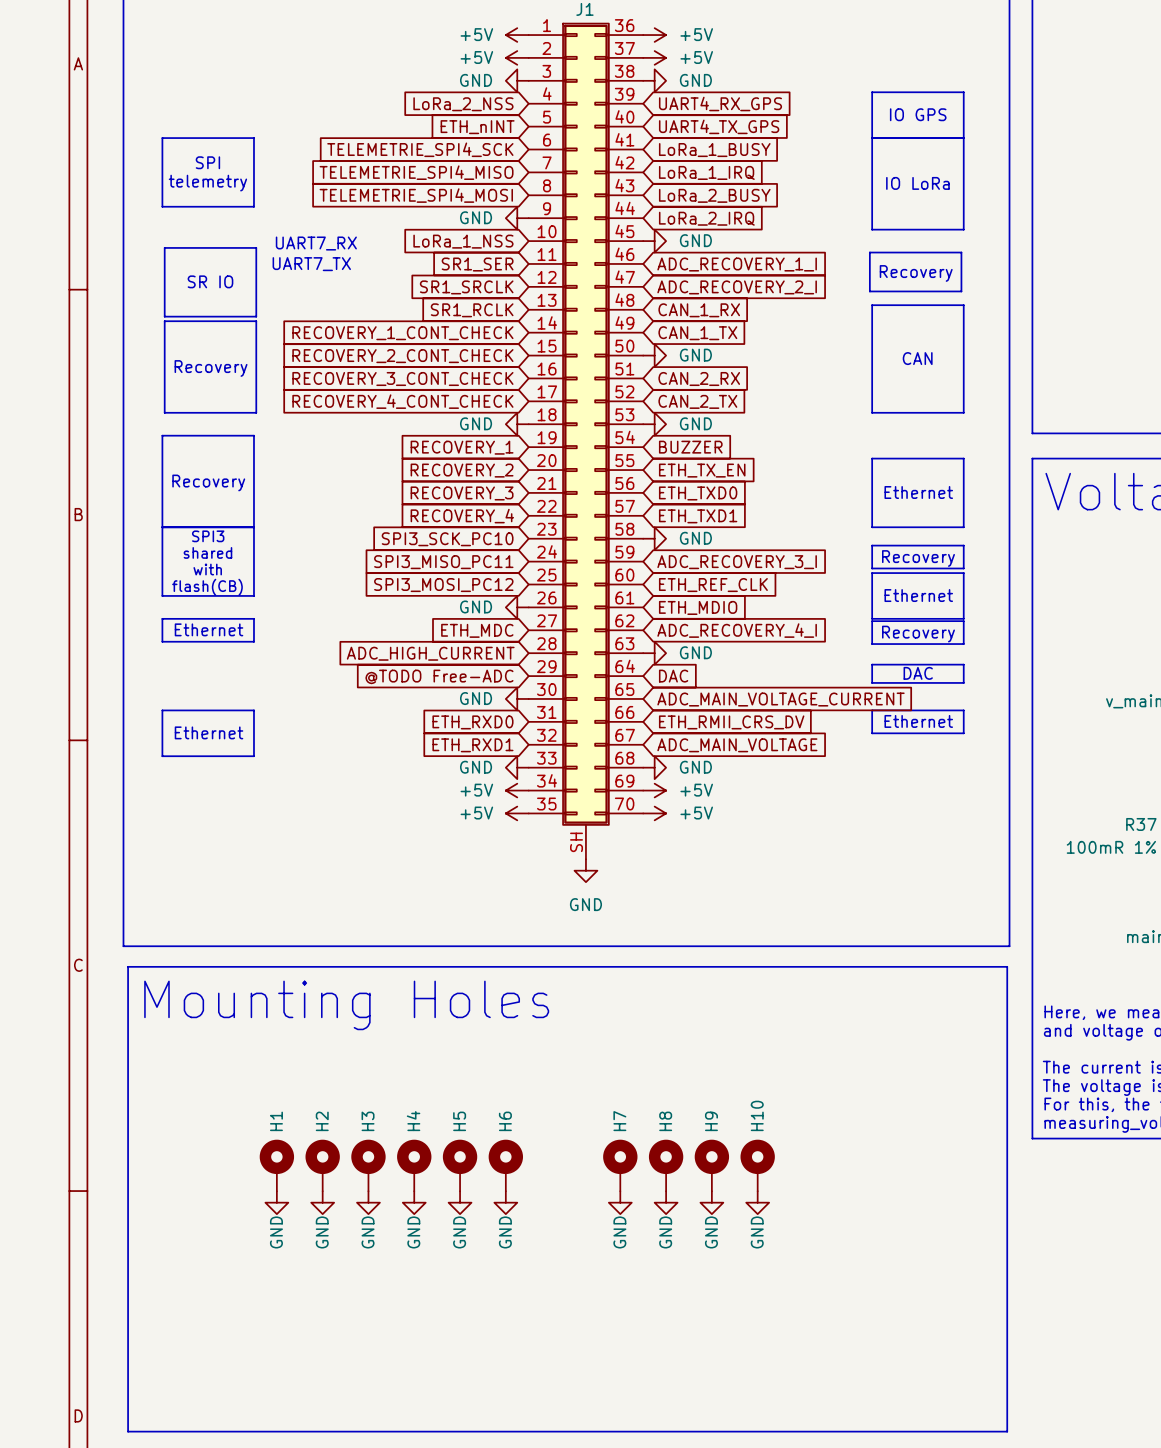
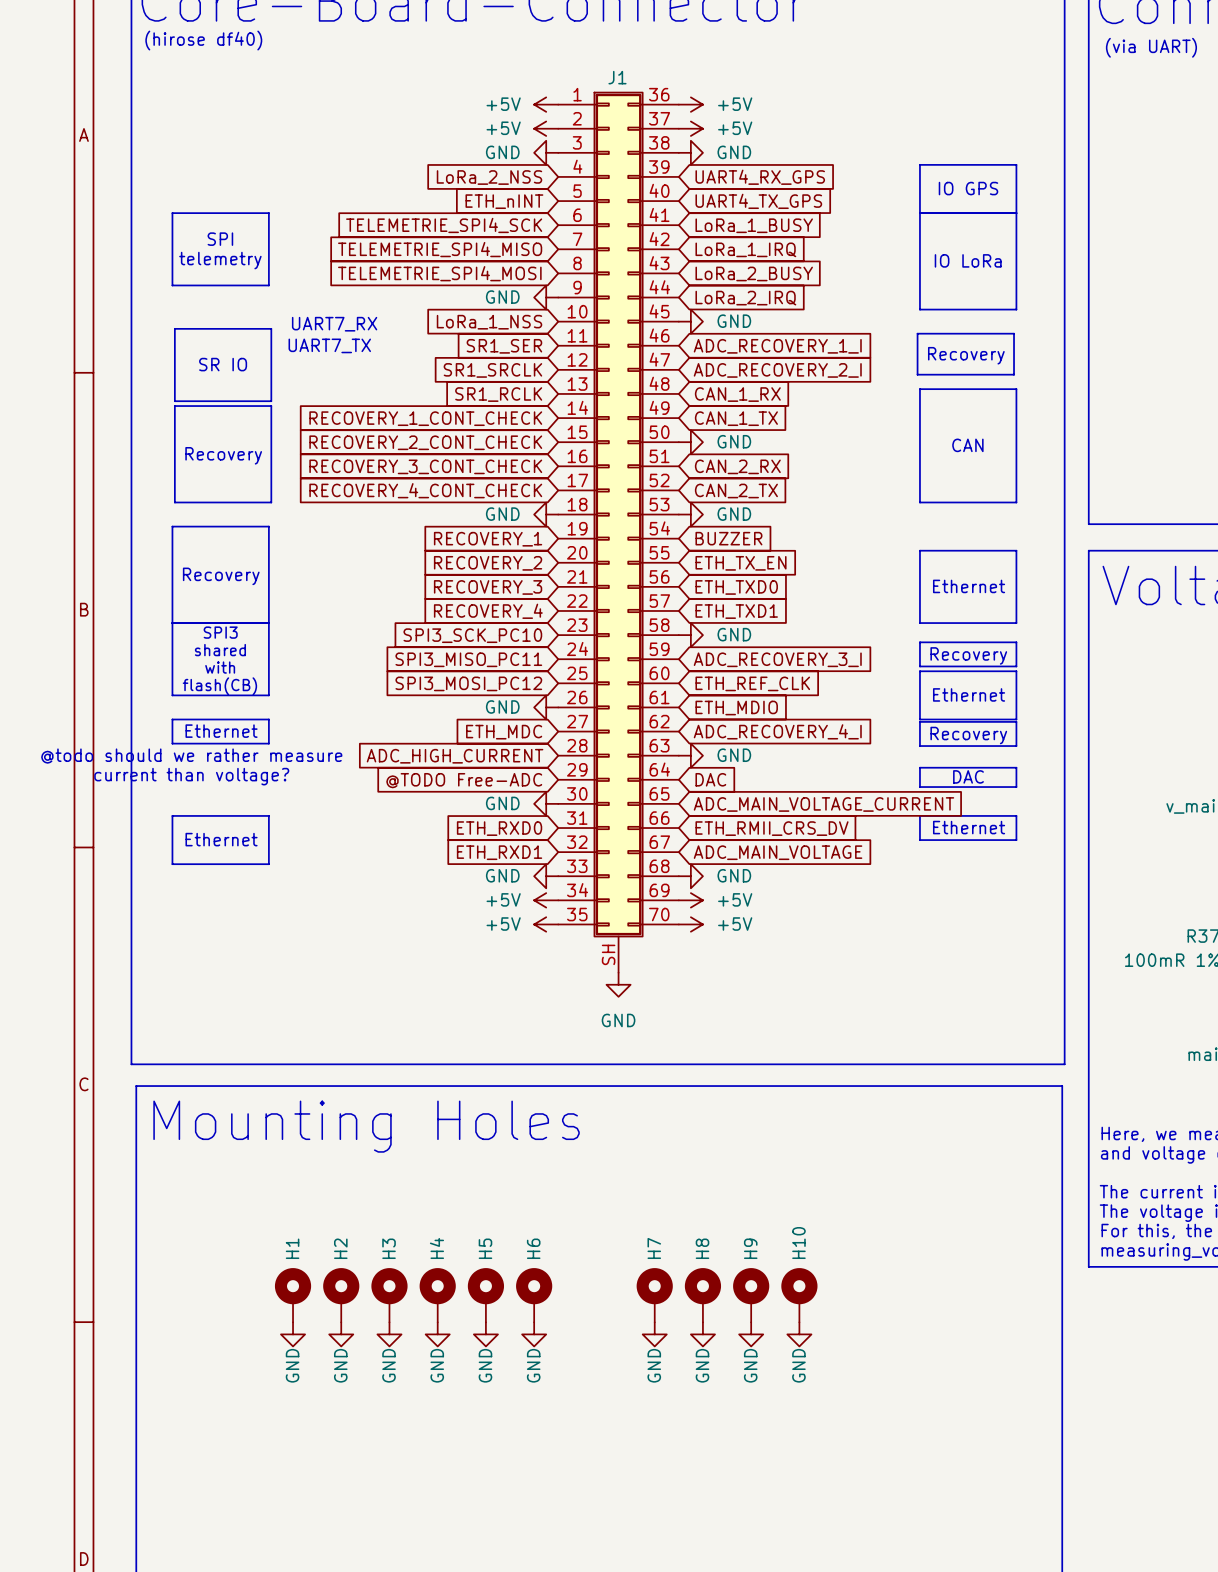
text: none -> @todo should we rather measure (191, 756)
text: none -> current than voltage? (191, 776)

